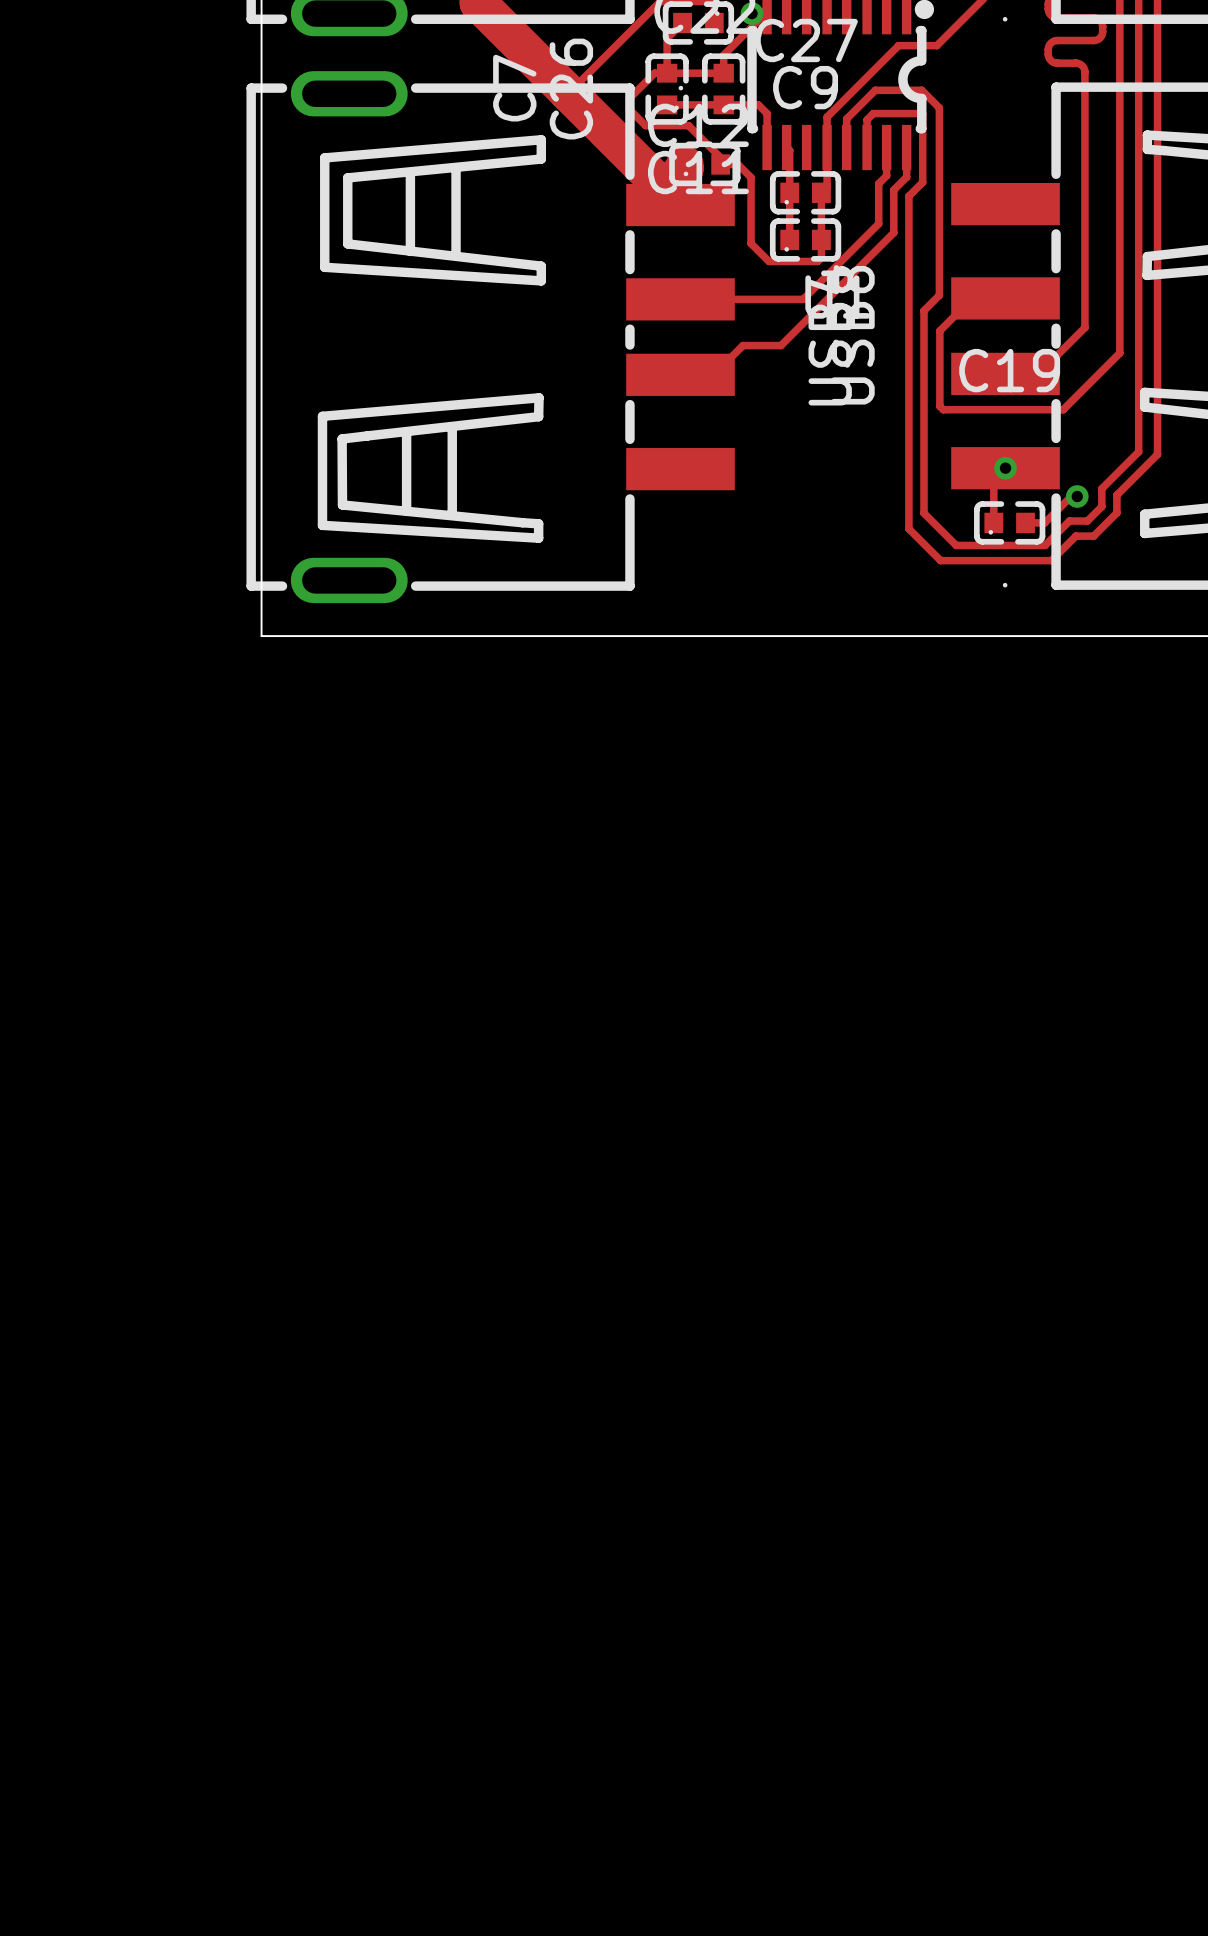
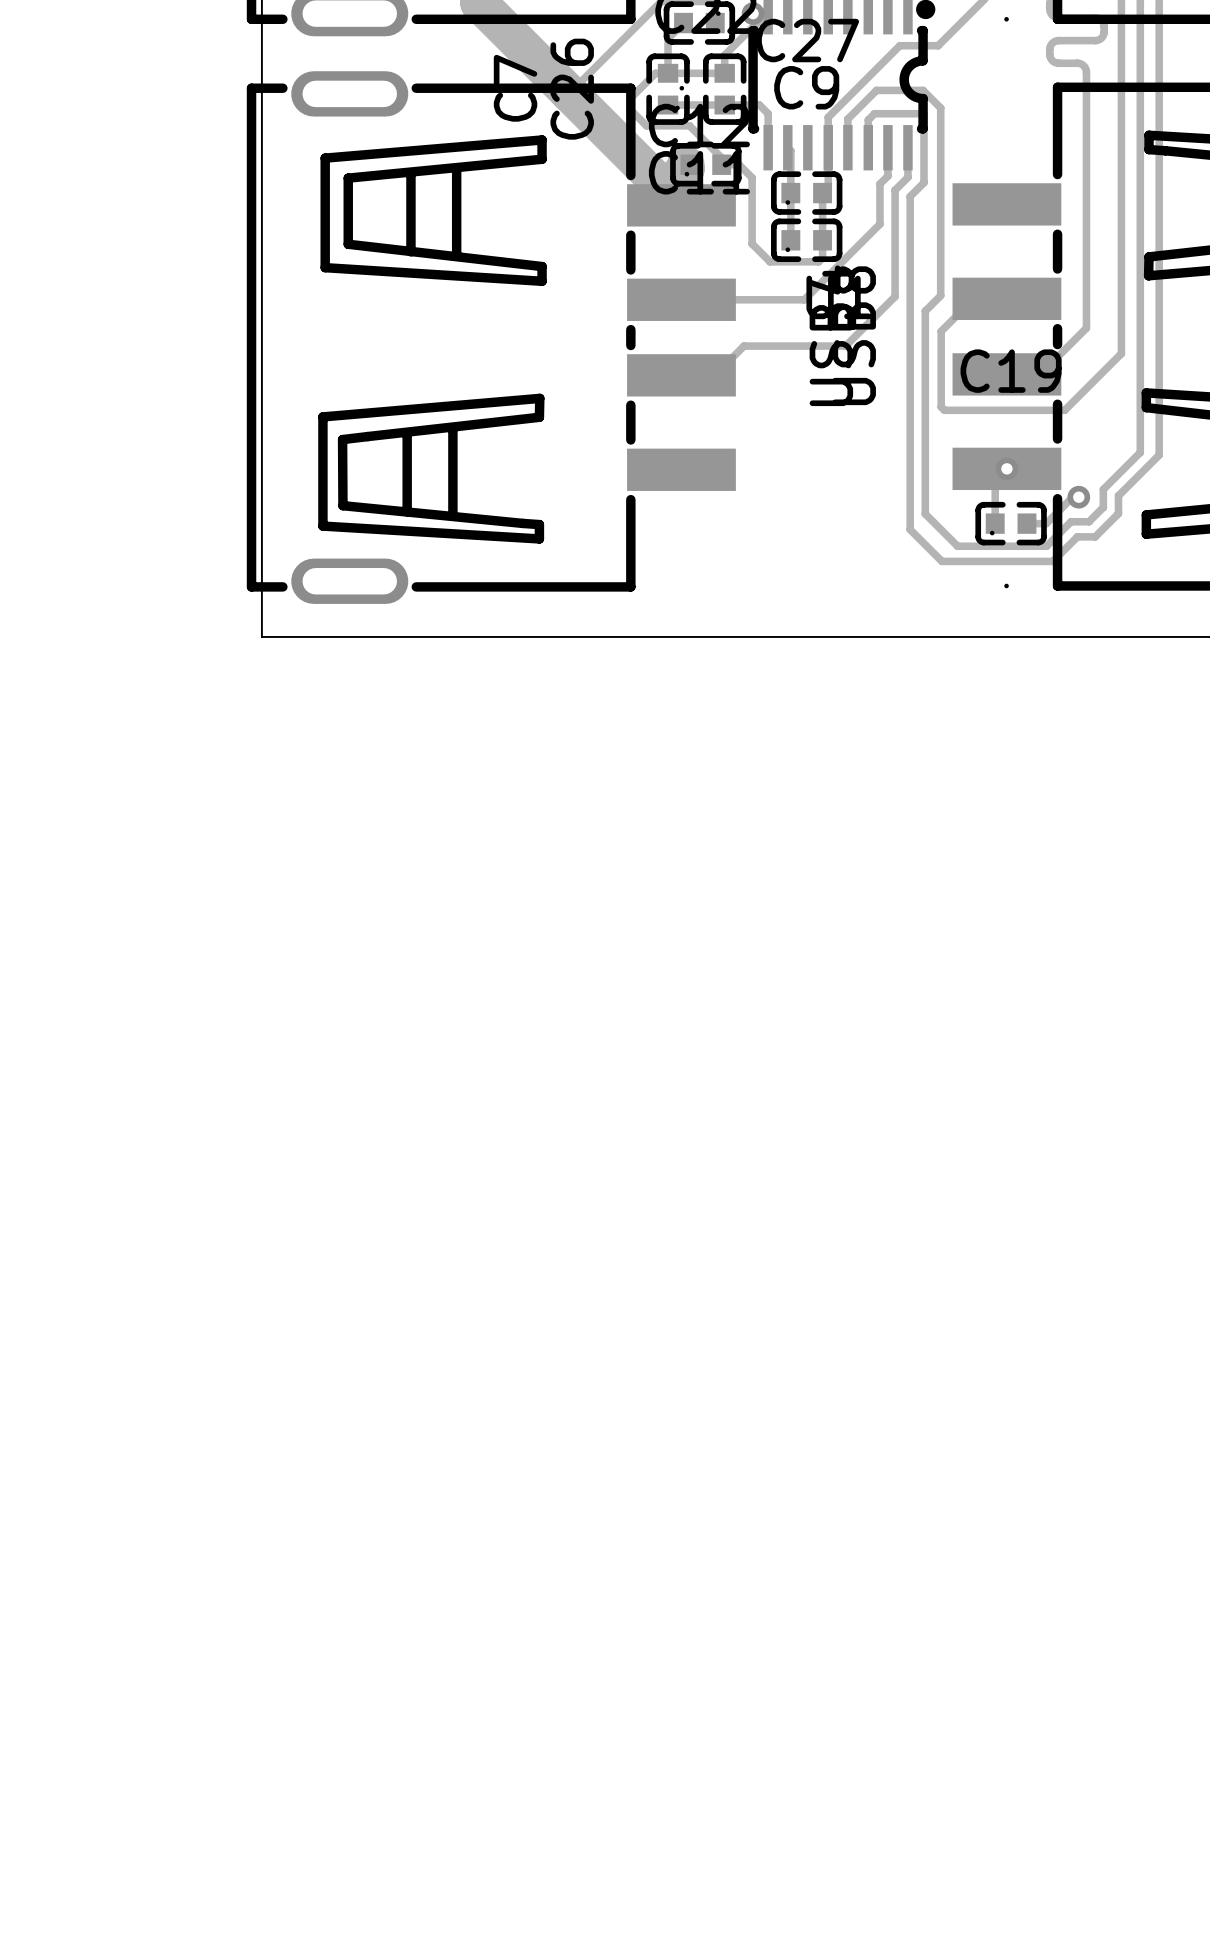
track: (893, 232) (780, 345) -> (895, 233) (895, 296) (845, 346) (782, 346)

